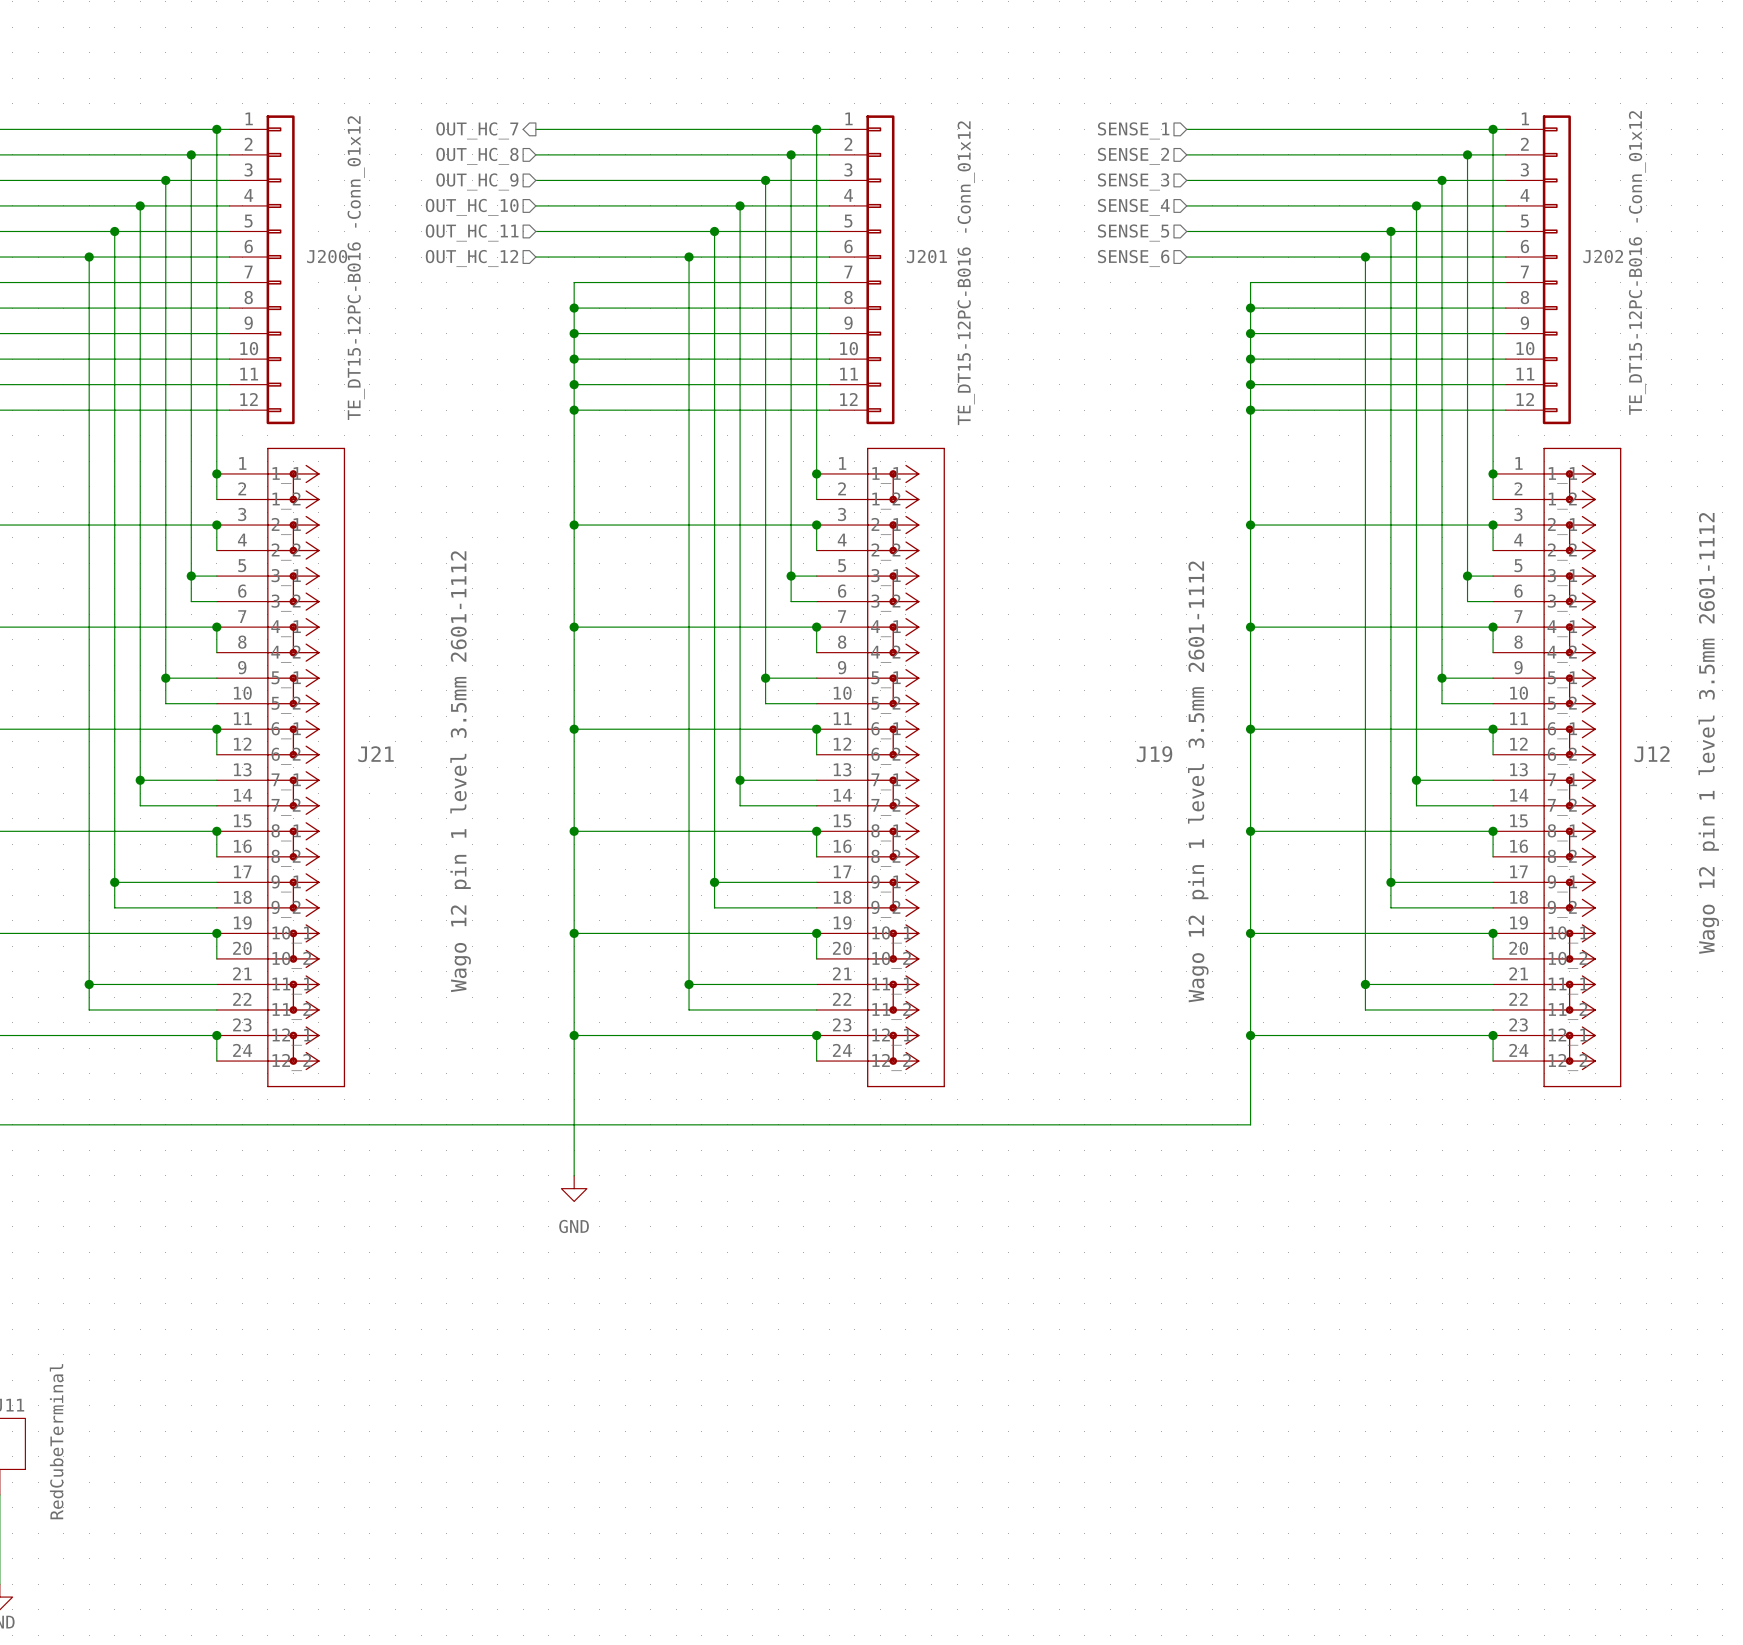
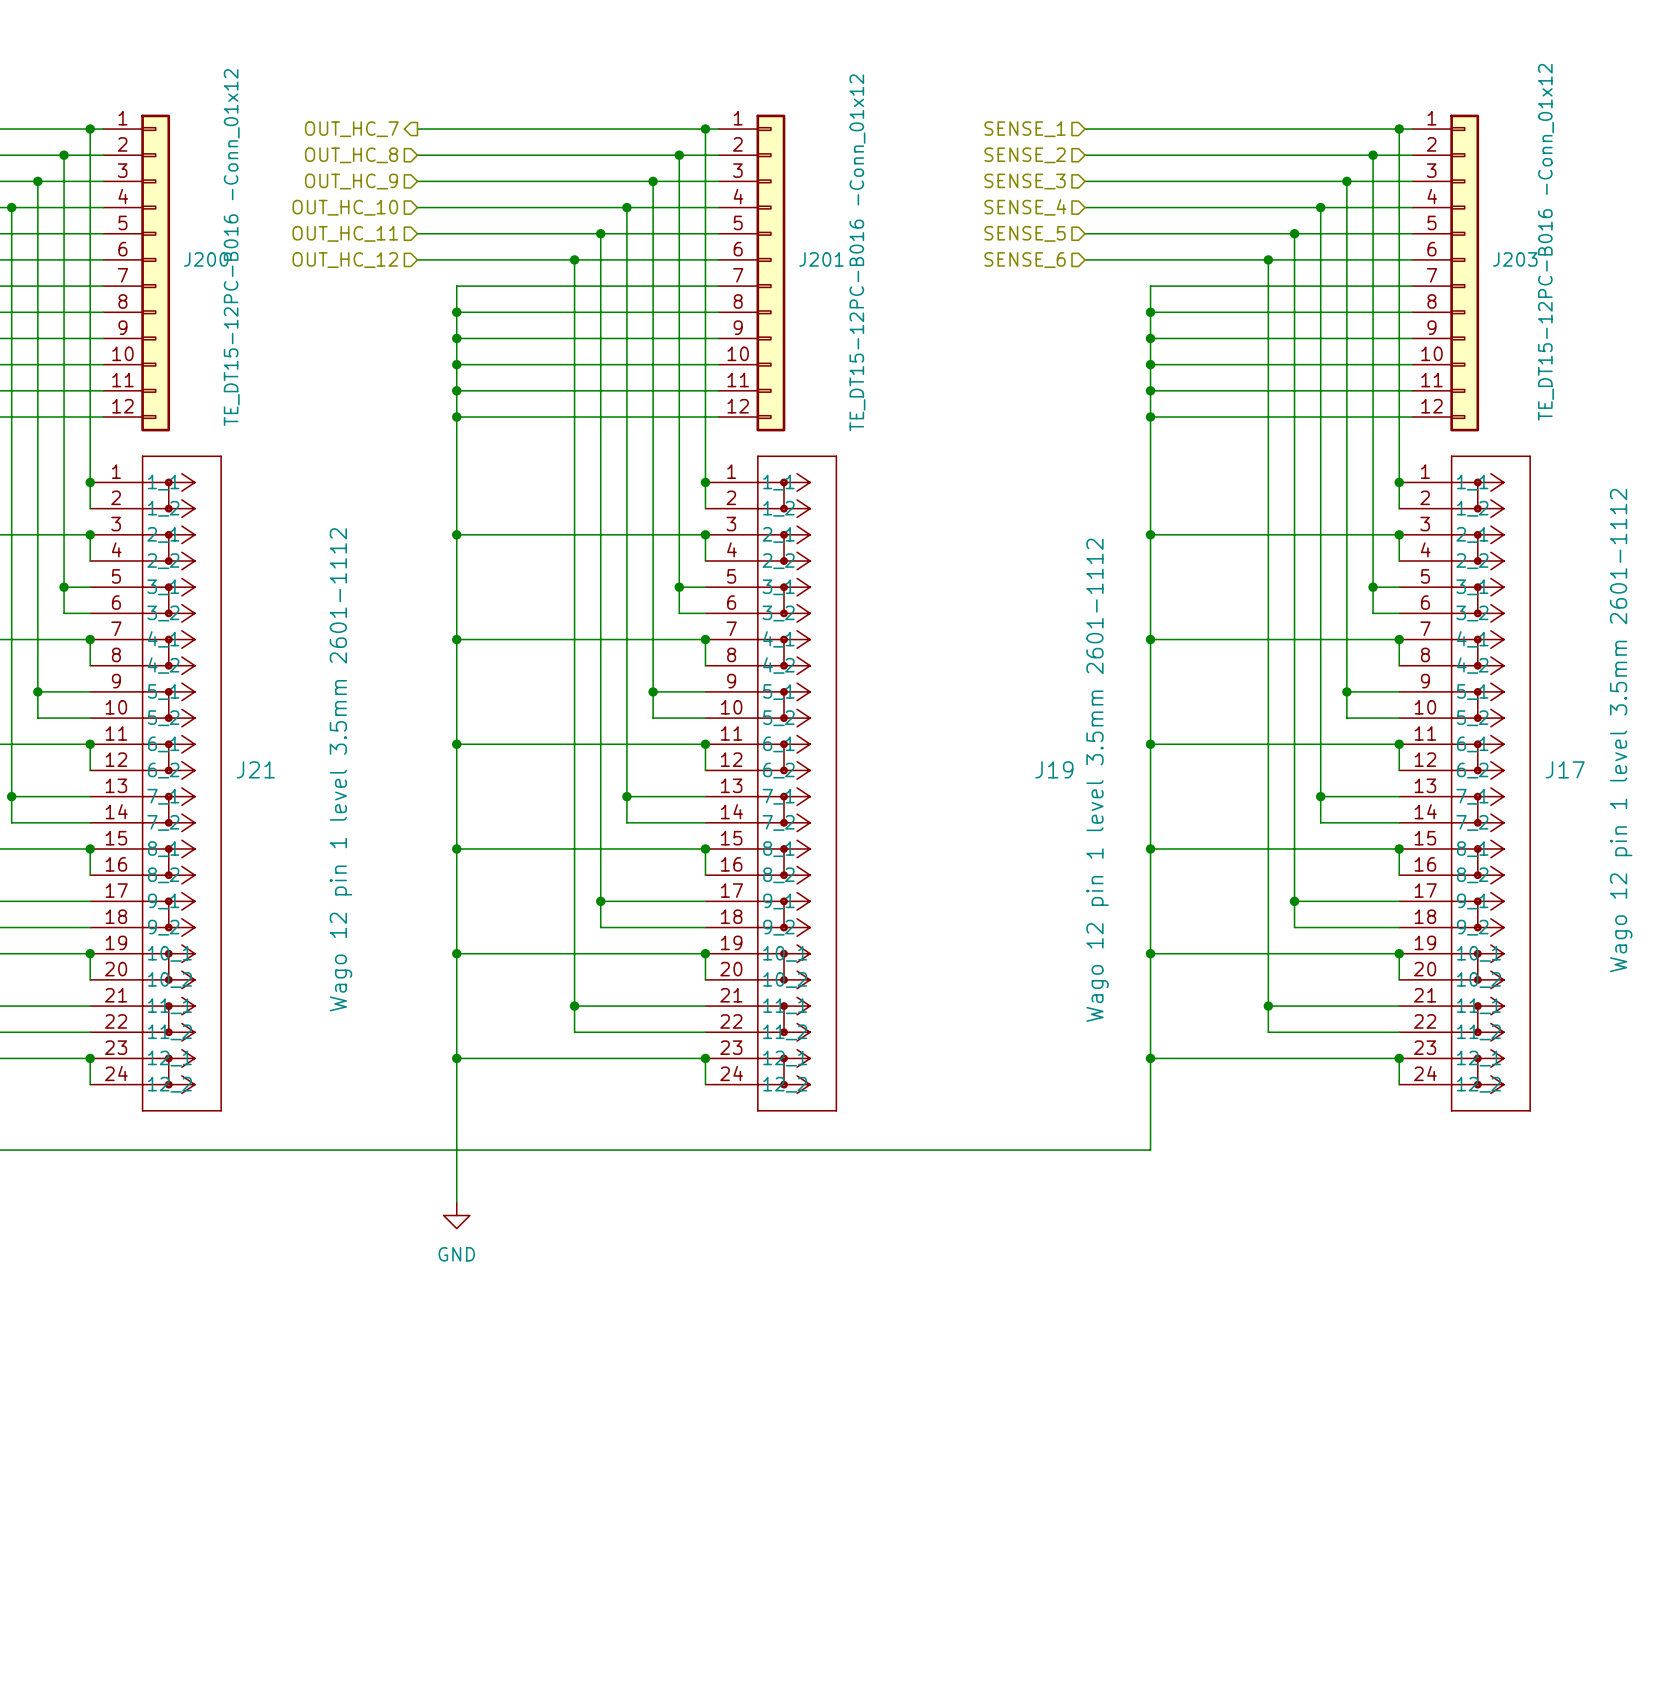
J202 name: J202 (1603, 256) -> J203 (1515, 259)
J12 name: J12 (1652, 754) -> J17 (1565, 769)

